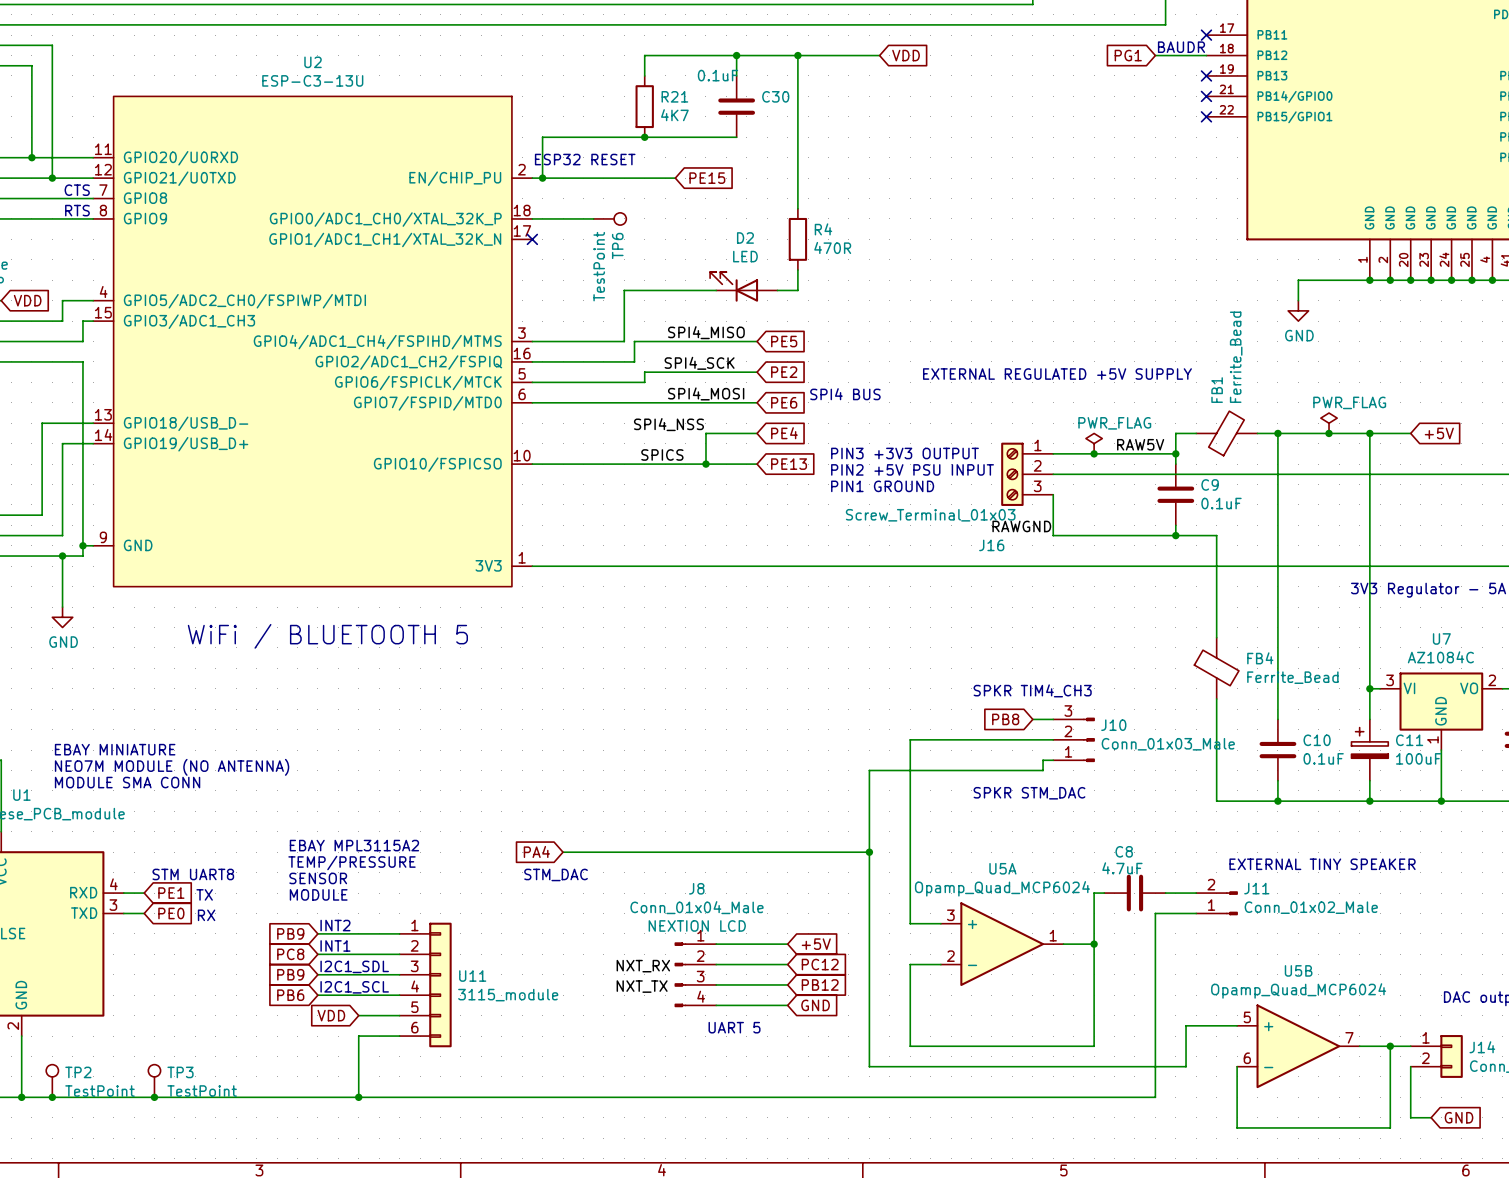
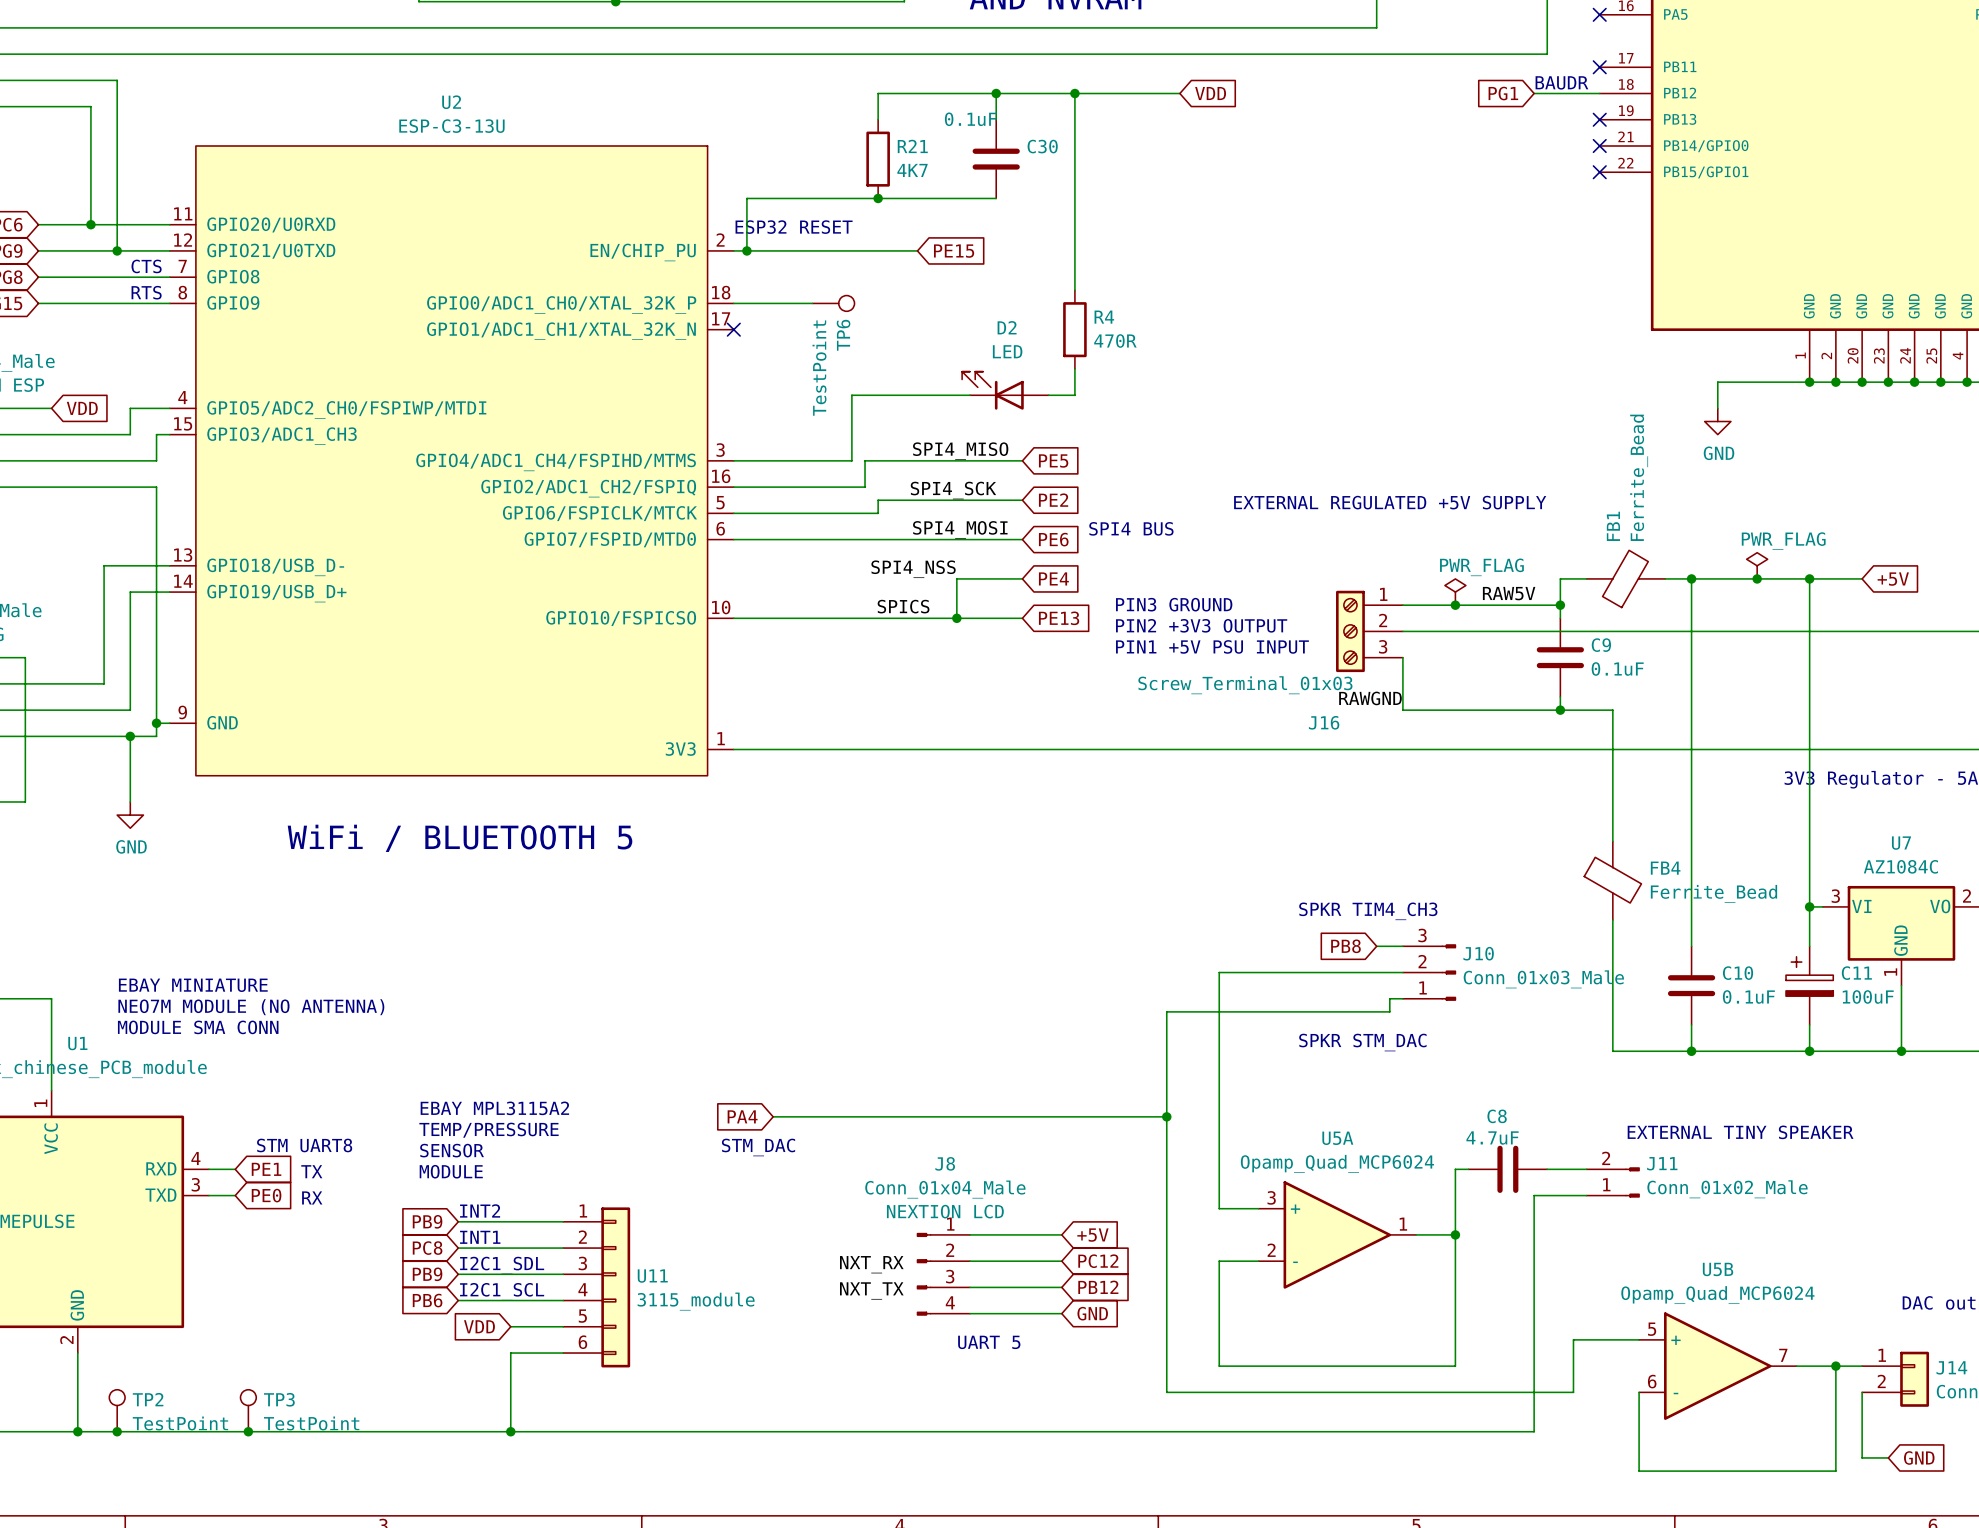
text: PIN3 +3V3 OUTPUT (904, 453) -> PIN3 GROUND (1174, 604)
text: PIN2 +5V PSU INPUT (912, 469) -> PIN2 +3V3 OUTPUT (1201, 625)
text: PIN1 GROUND (882, 486) -> PIN1 +5V PSU INPUT (1212, 646)

